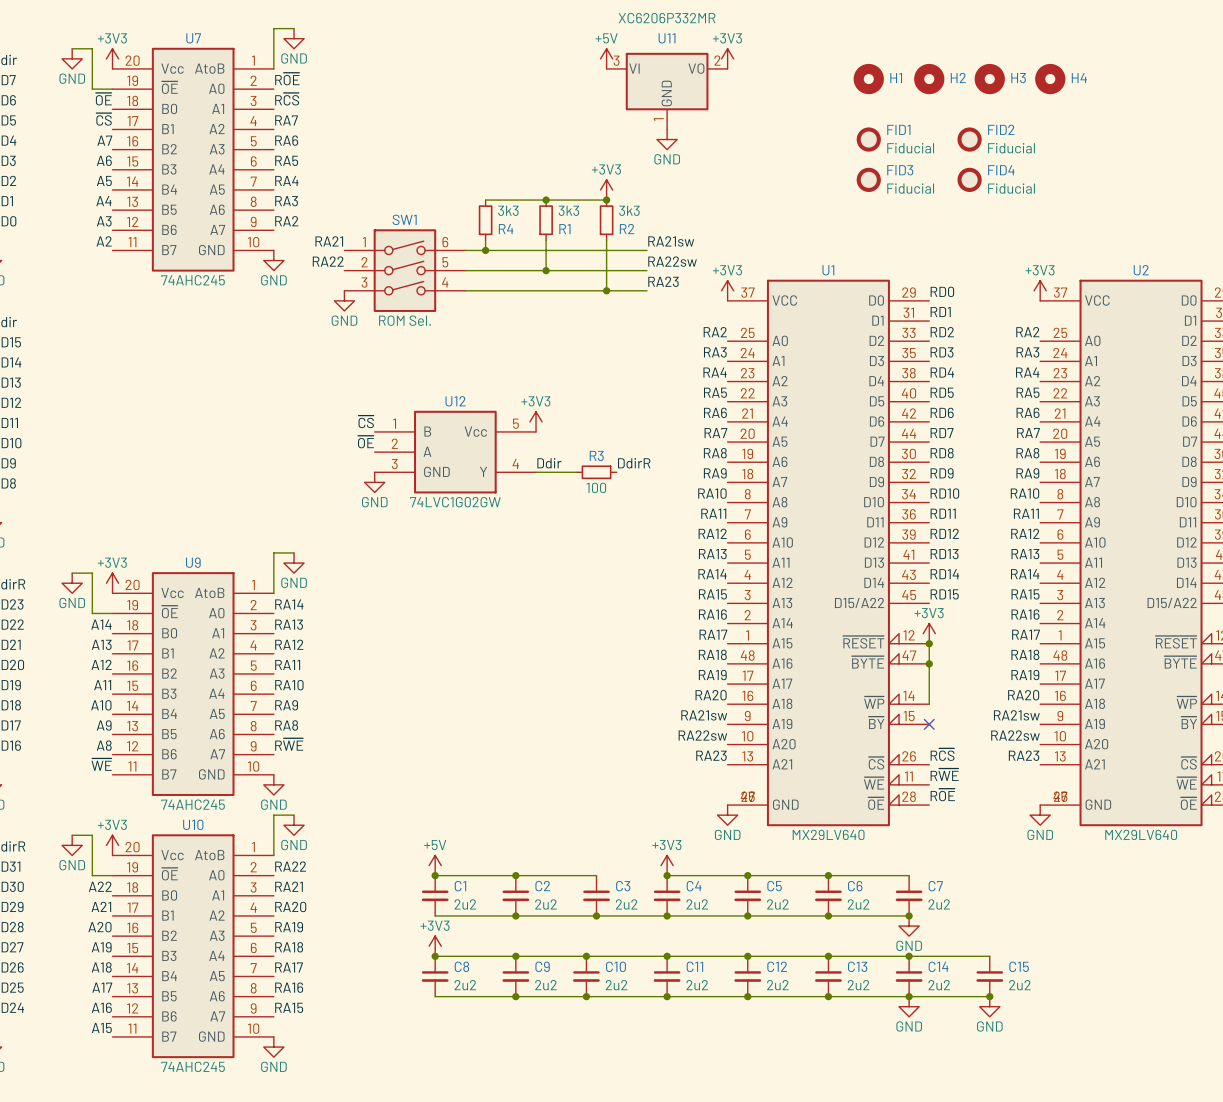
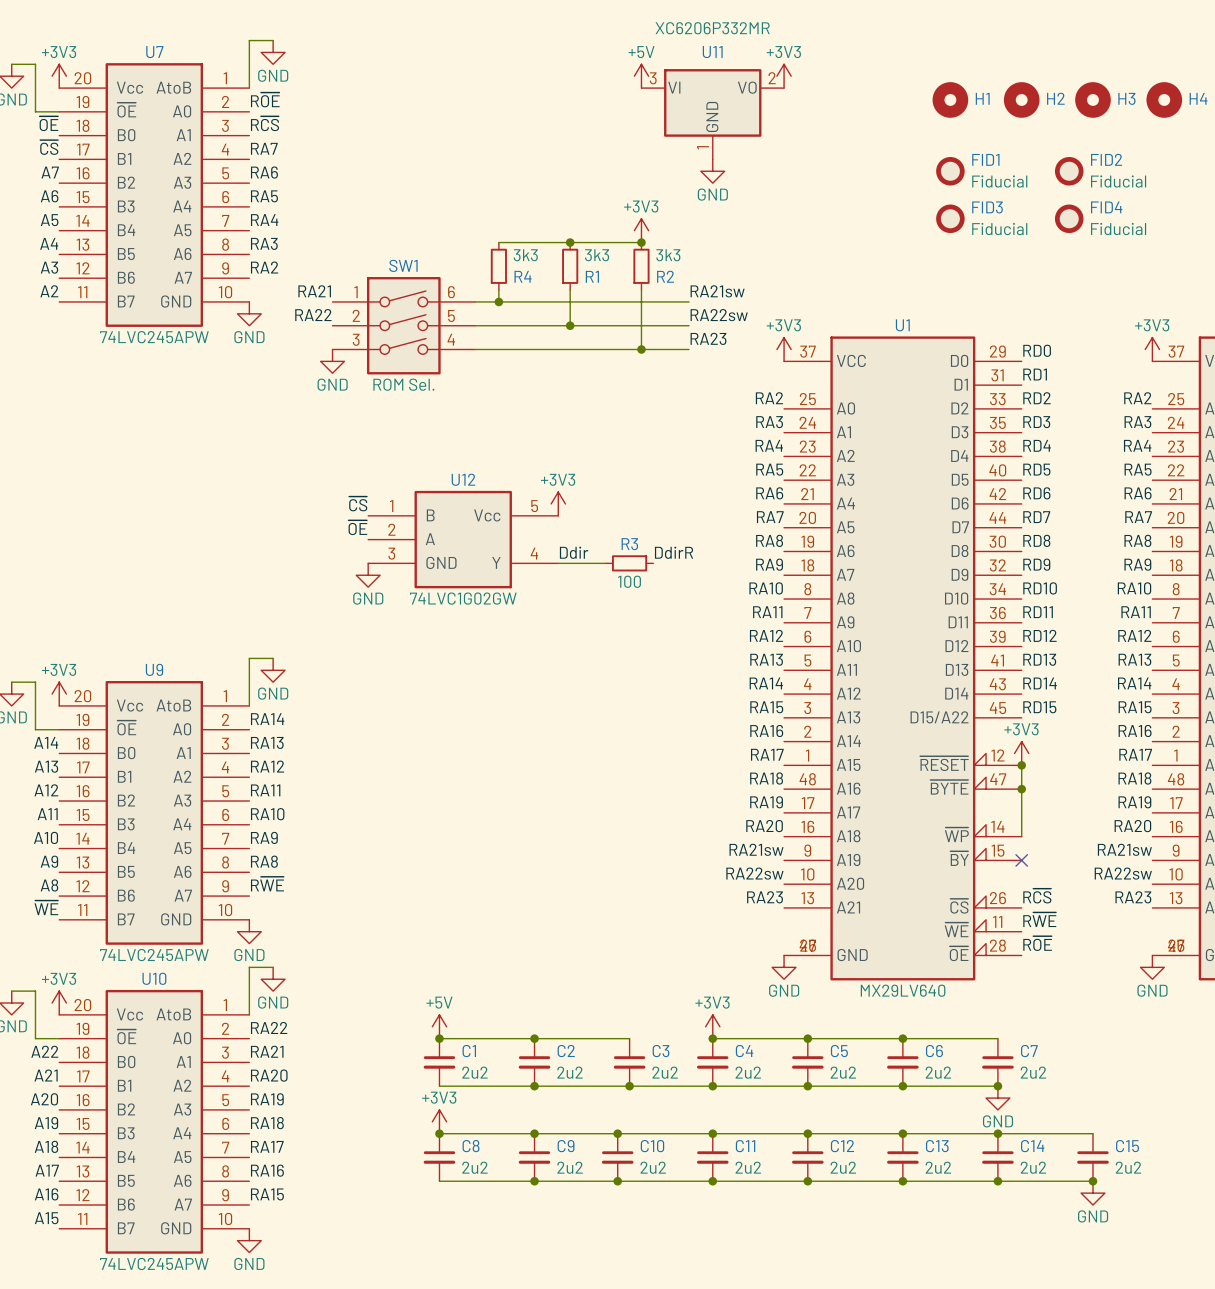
U7 value: 74AHC245 (193, 280) -> 74LVC245APW (154, 337)
U9 value: 74AHC245 (193, 804) -> 74LVC245APW (154, 955)
power symbol: GND (909, 1006) -> none
U10 value: 74AHC245 (193, 1066) -> 74LVC245APW (154, 1263)

